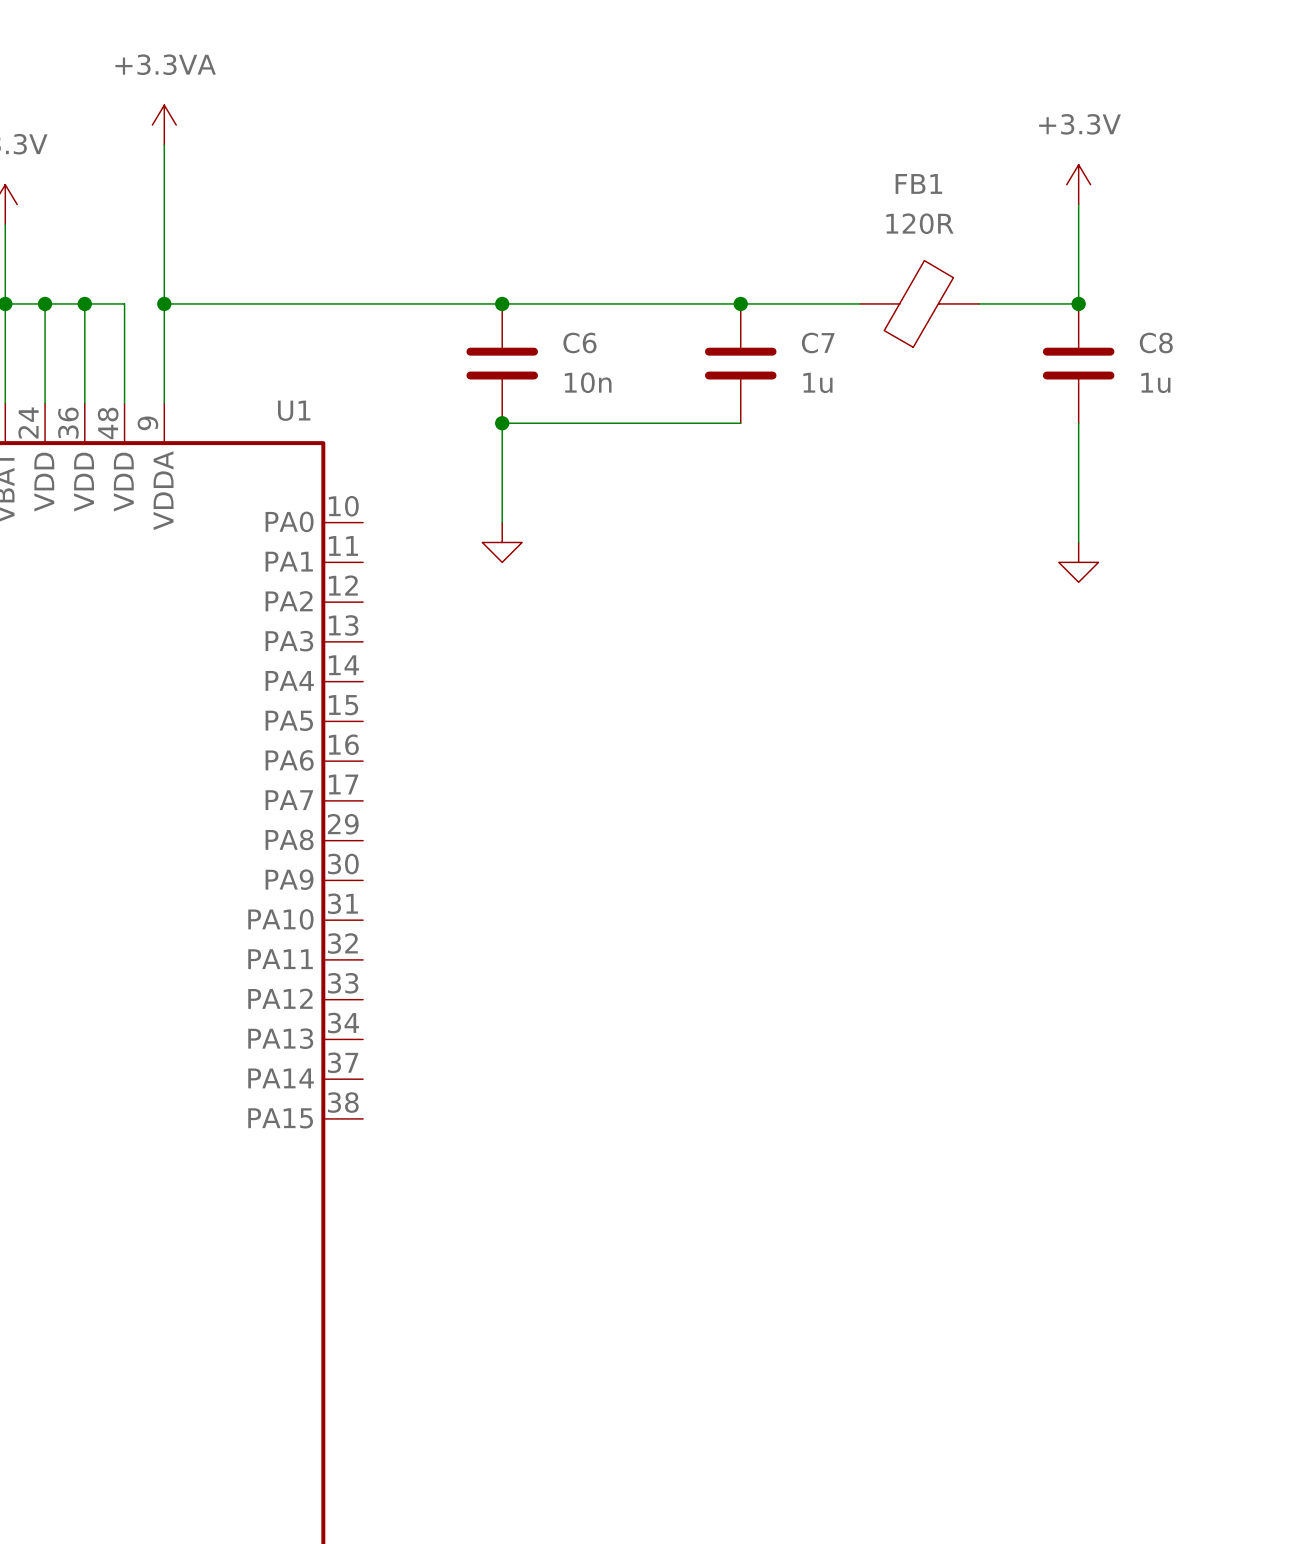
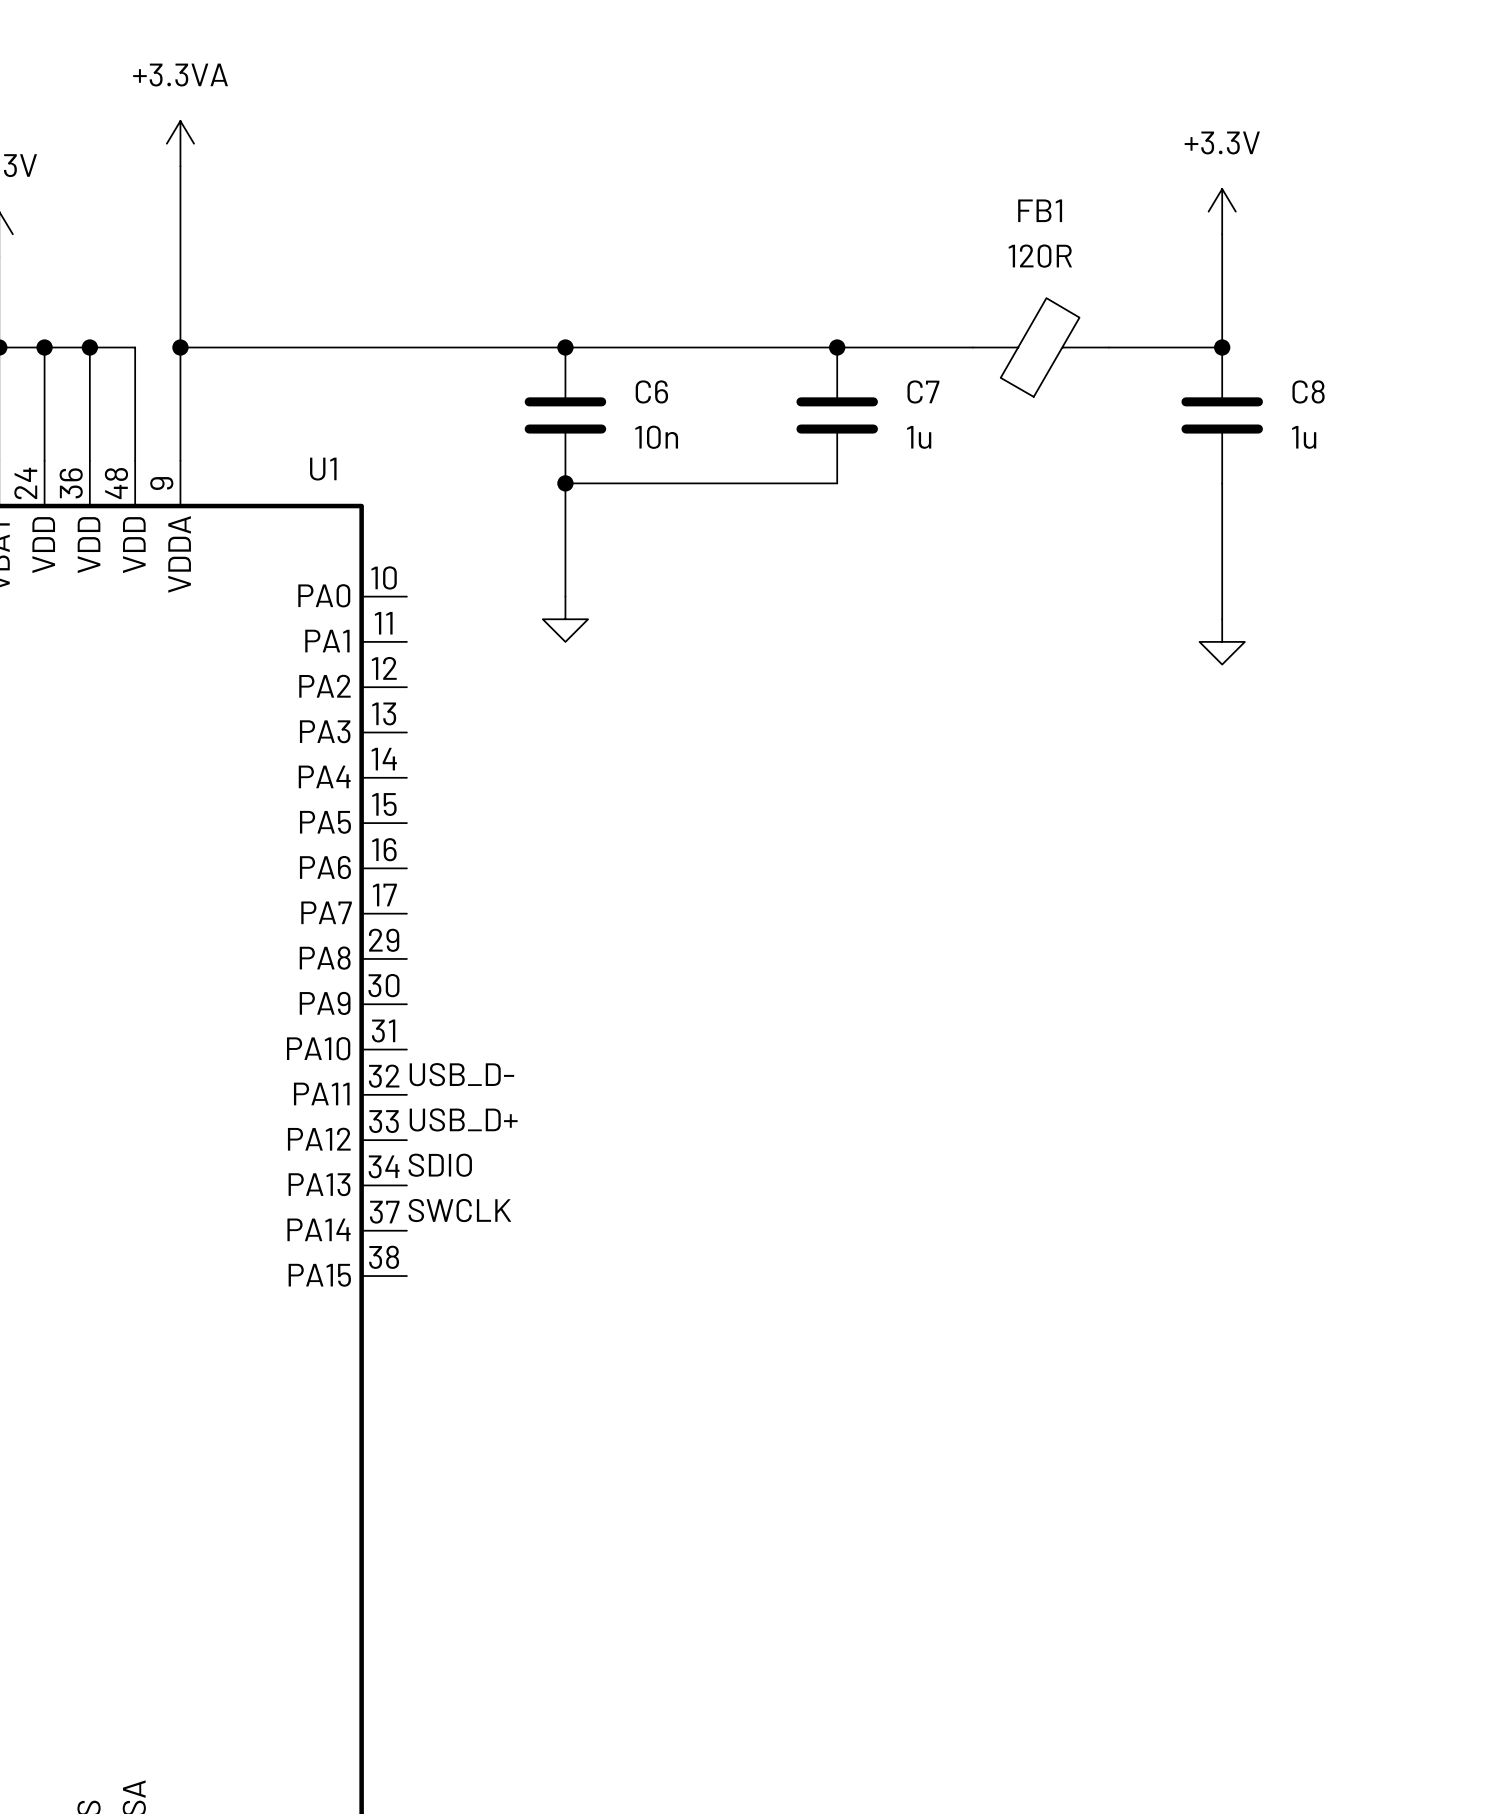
label: none -> USB_D- (461, 1074)
label: none -> USB_D+ (463, 1119)
label: none -> SDIO (440, 1165)
label: none -> SWCLK (459, 1210)

